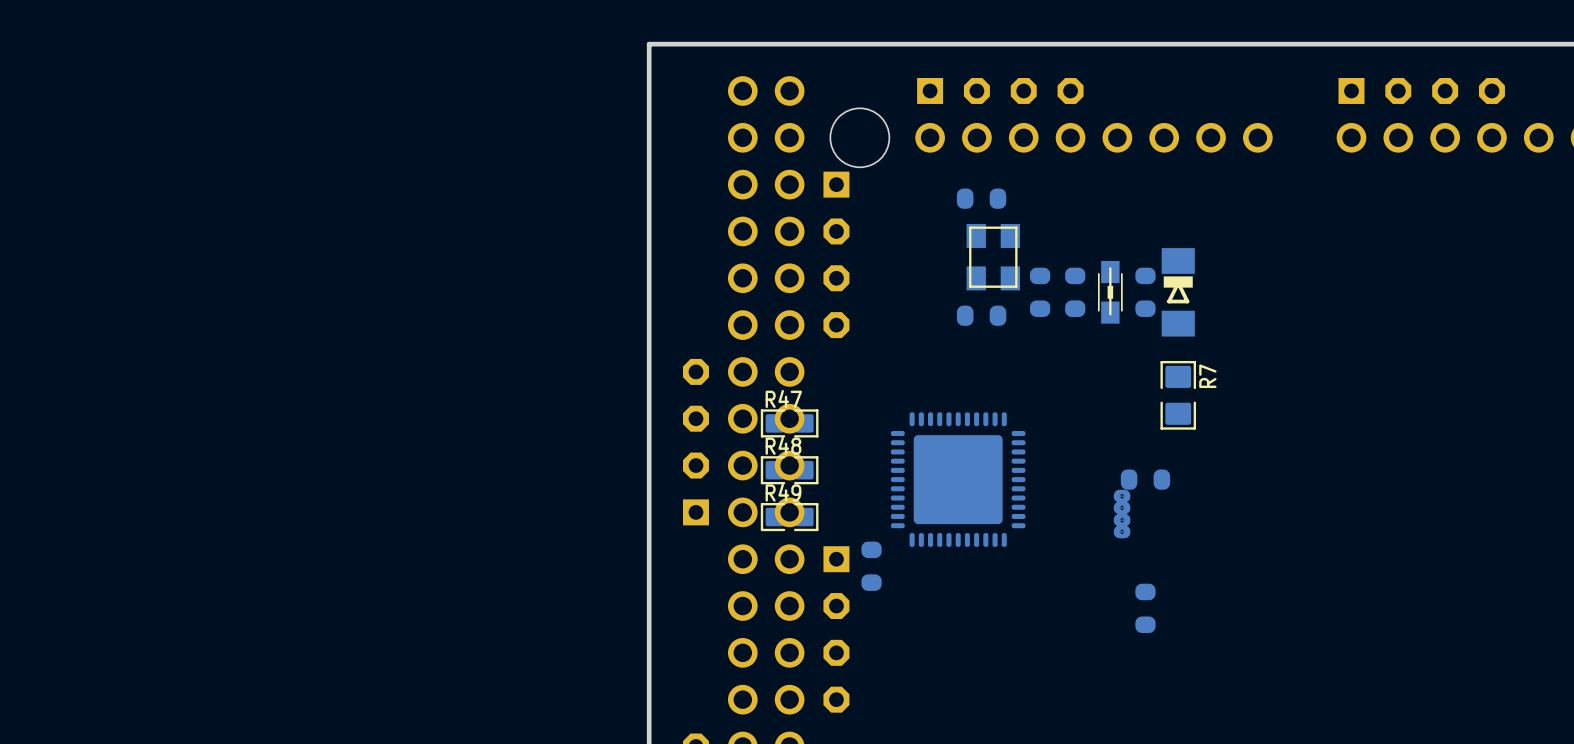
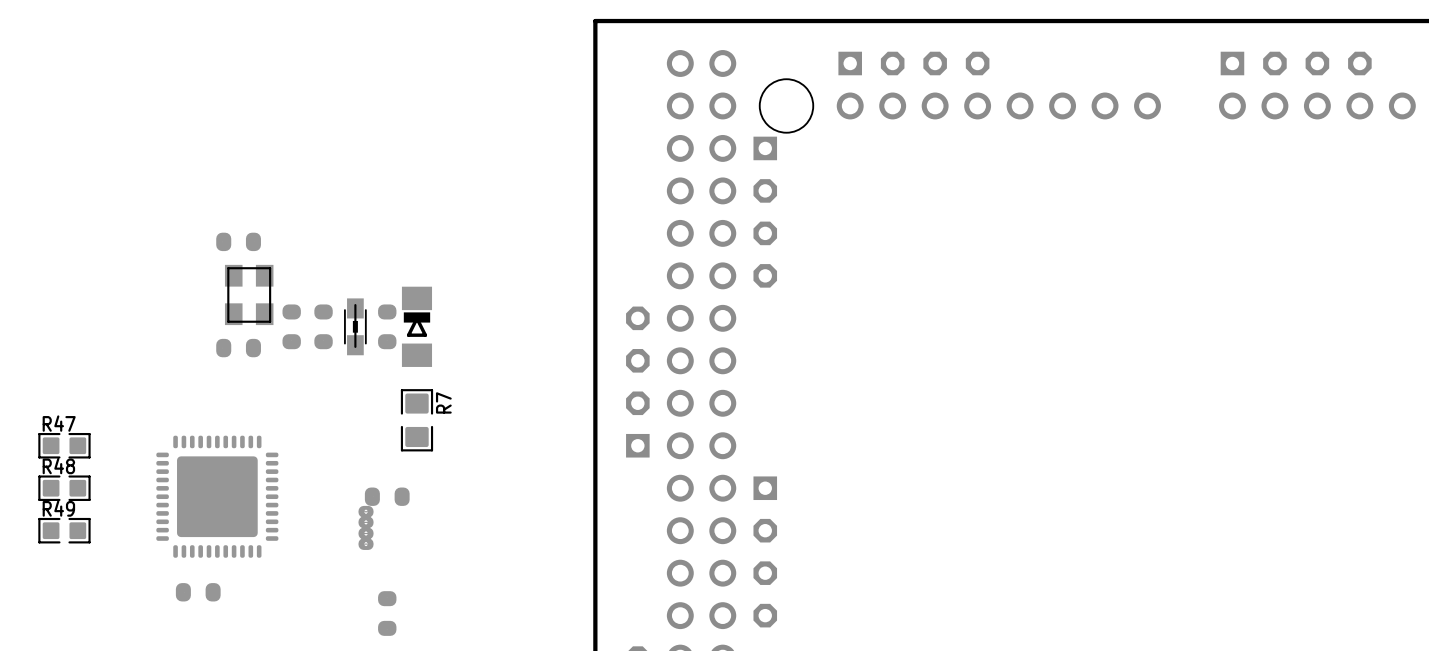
part: (981, 198) -> none
part: (993, 257) -> none
part: none -> (238, 241)
part: (1040, 292) -> none
part: (1075, 292) -> none
part: (1110, 292) -> none
part: (1145, 292) -> none
part: (1178, 292) -> none
part: (981, 315) -> none
part: none -> (249, 294)
part: none -> (291, 326)
part: none -> (323, 326)
part: none -> (355, 326)
part: none -> (387, 326)
part: none -> (416, 326)
R7 position: (1178, 395) -> (416, 420)
part: none -> (238, 348)
R47 position: (789, 423) -> (64, 445)
R48 position: (789, 470) -> (64, 488)
part: (958, 479) -> none
part: (1145, 479) -> none
part: (1122, 508) -> none
R49 position: (789, 517) -> (64, 530)
part: (1122, 519) -> none
part: (871, 566) -> none
part: none -> (217, 496)
part: none -> (387, 496)
part: none -> (366, 522)
part: none -> (366, 533)
part: (1145, 608) -> none
part: none -> (198, 592)
part: none -> (387, 613)

